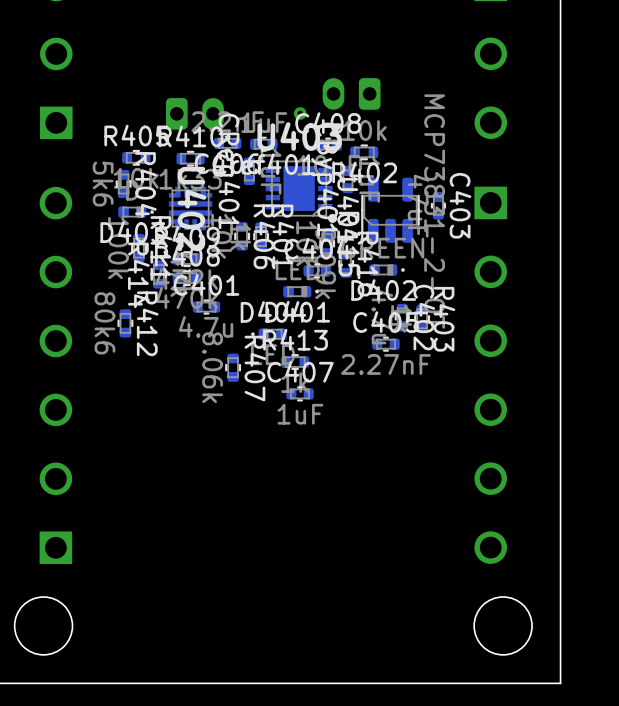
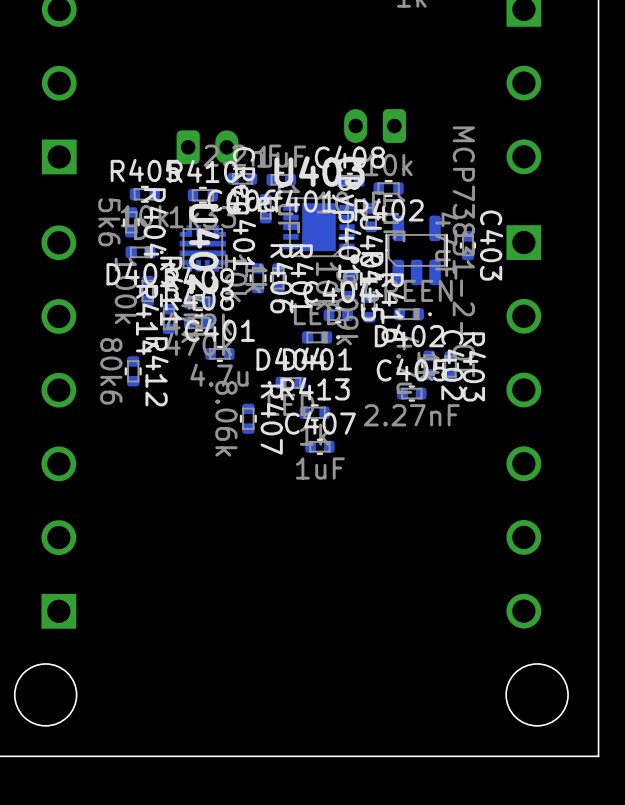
via: (300, 113) -> none

